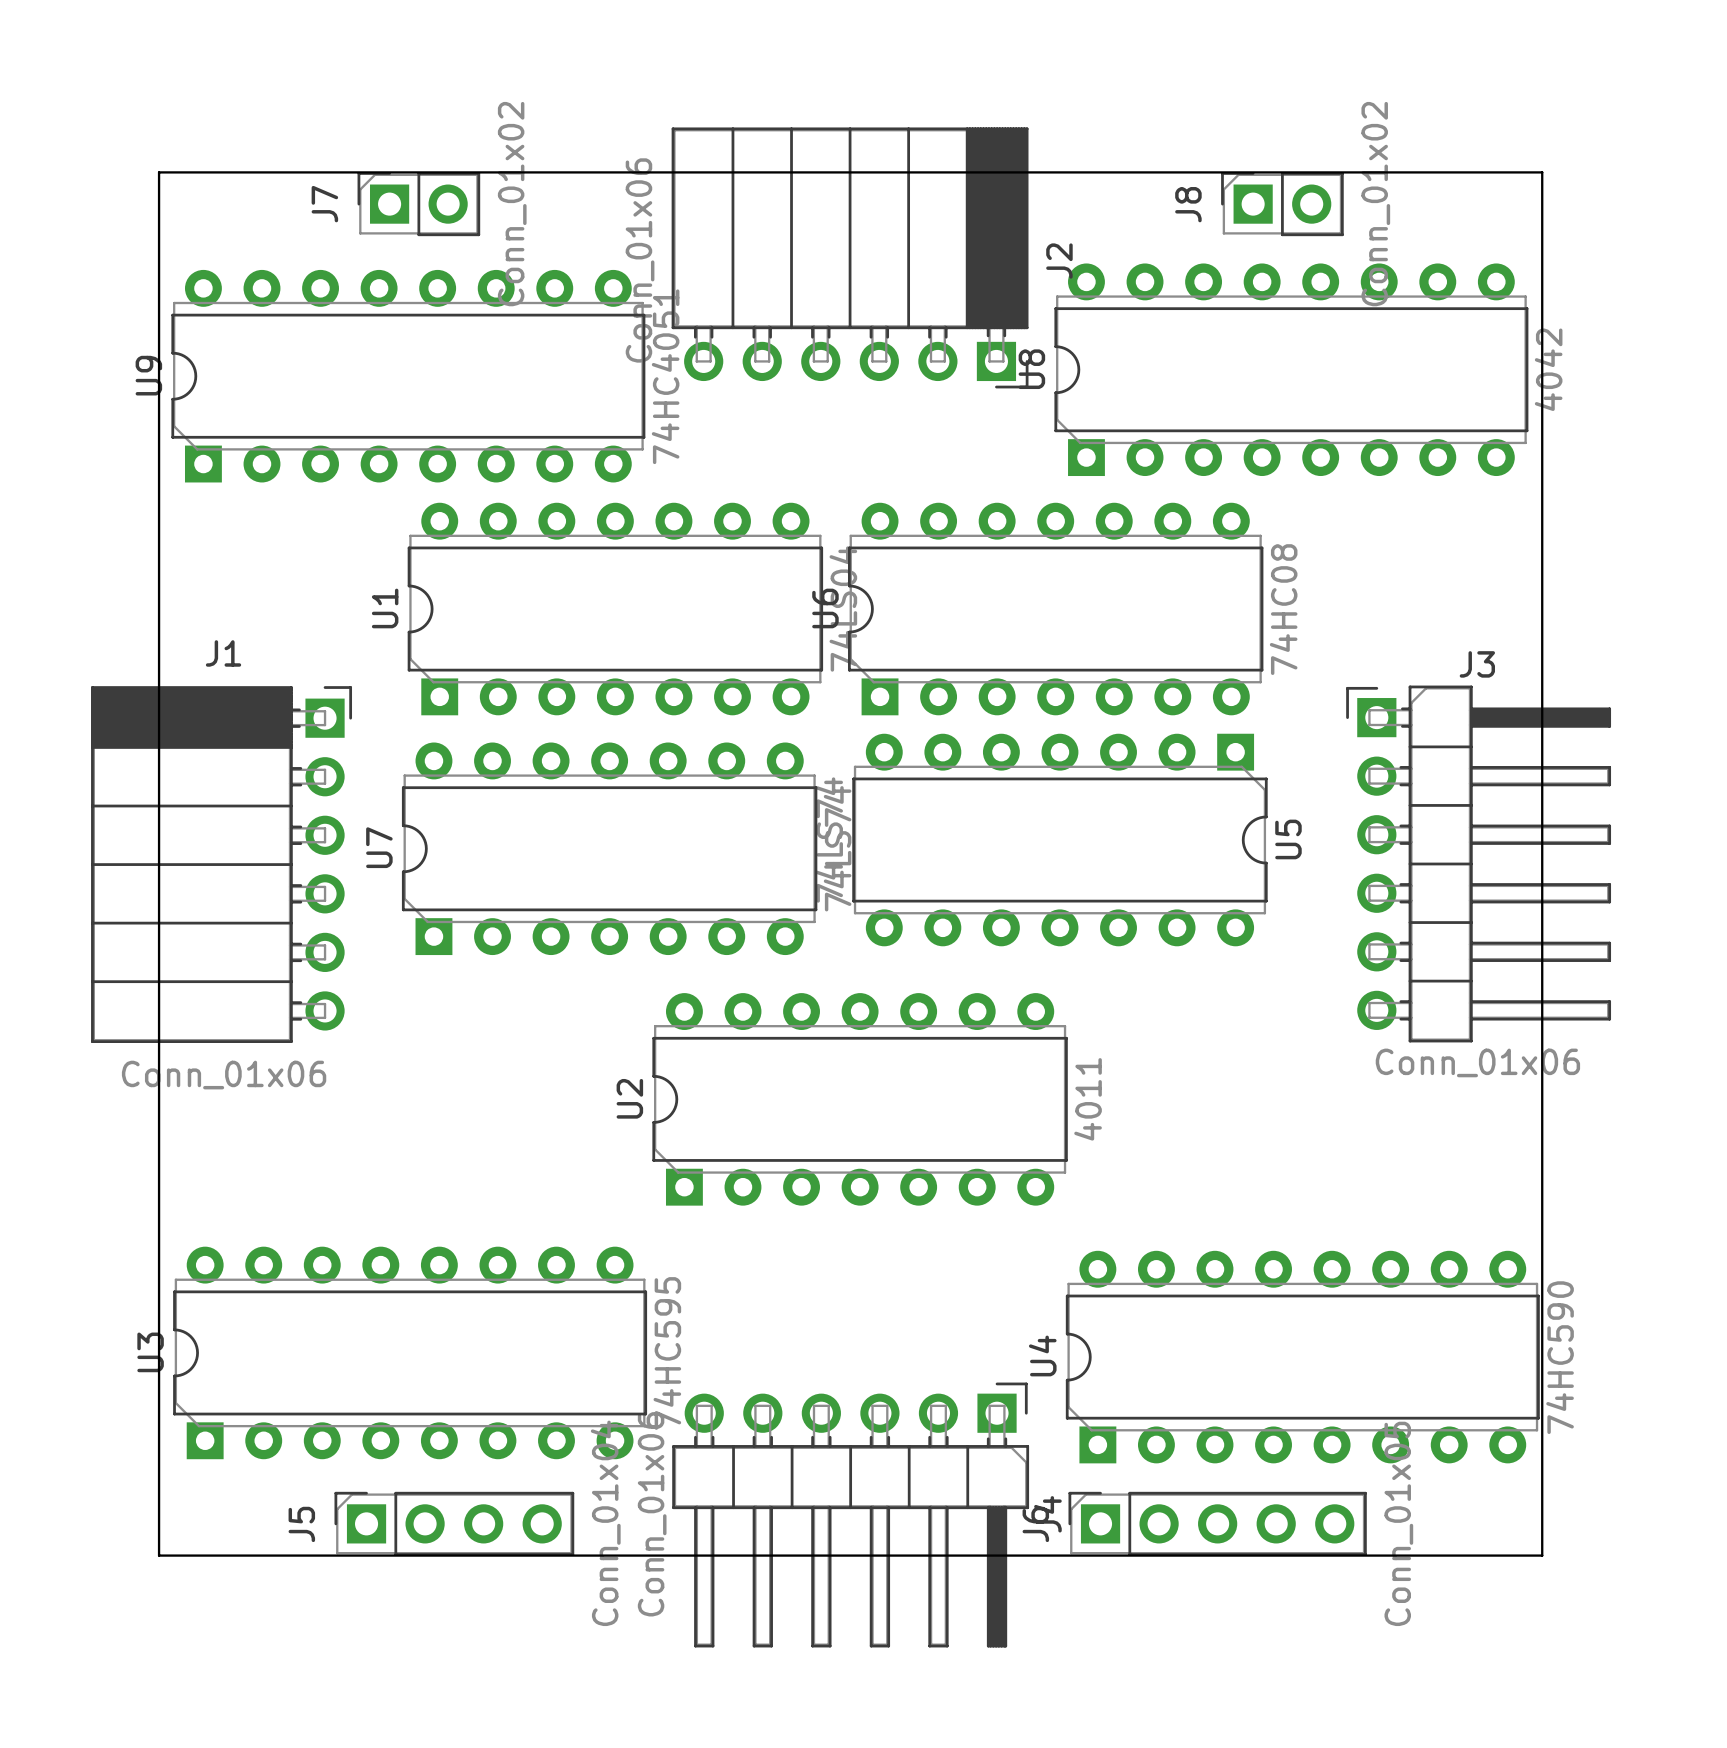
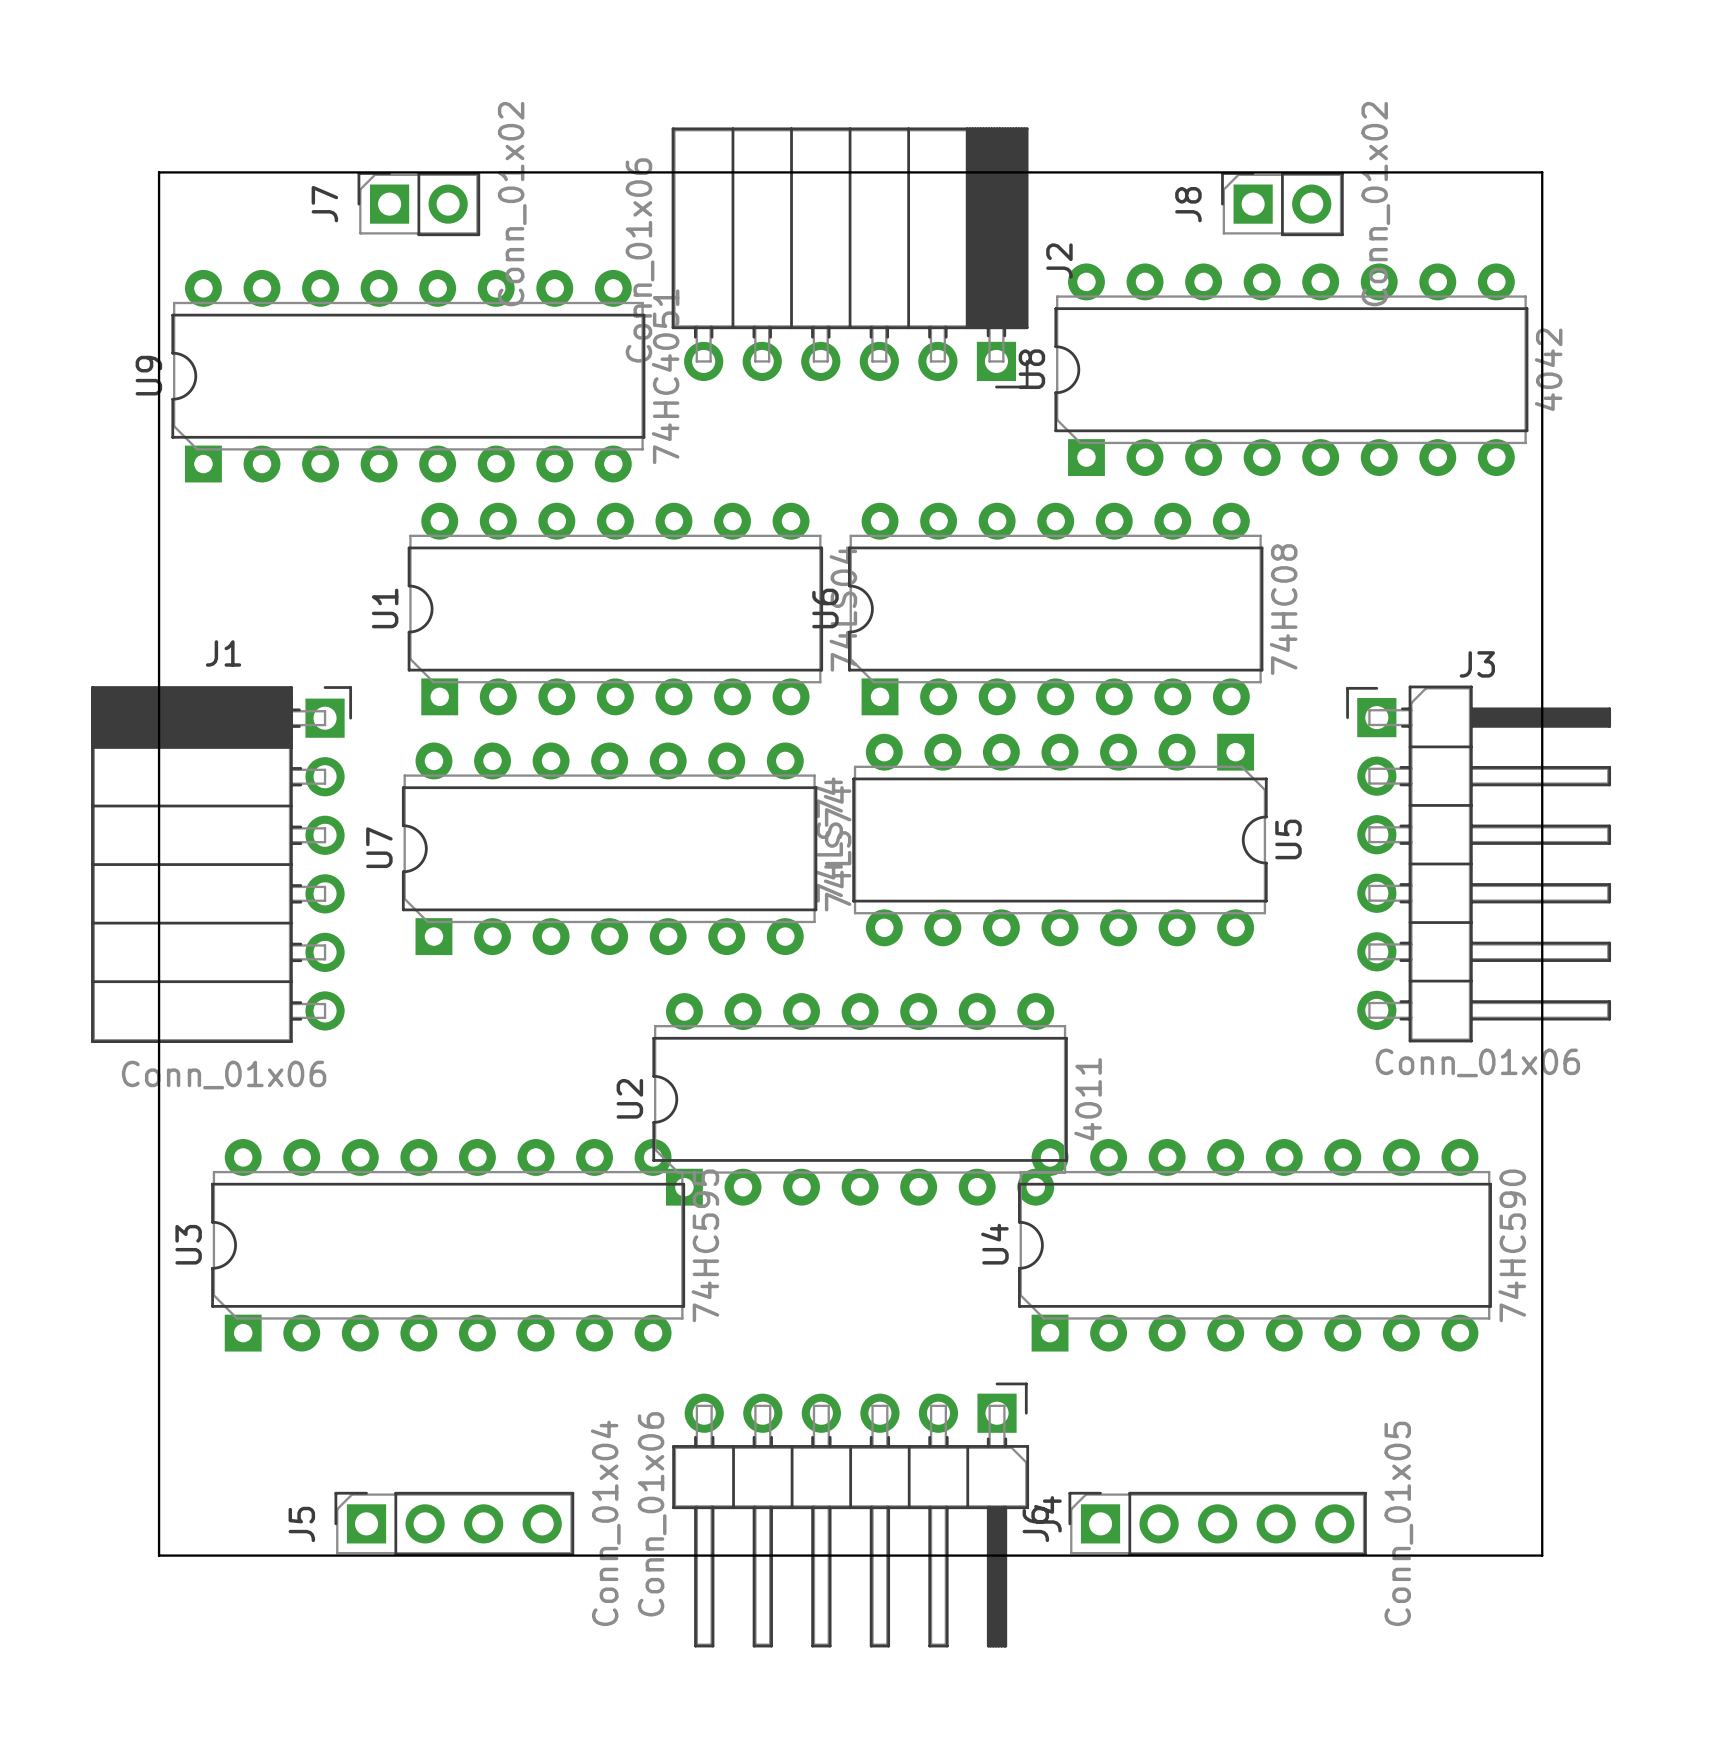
U3 position: (410, 1352) -> (448, 1245)
U4 position: (1302, 1357) -> (1254, 1245)

